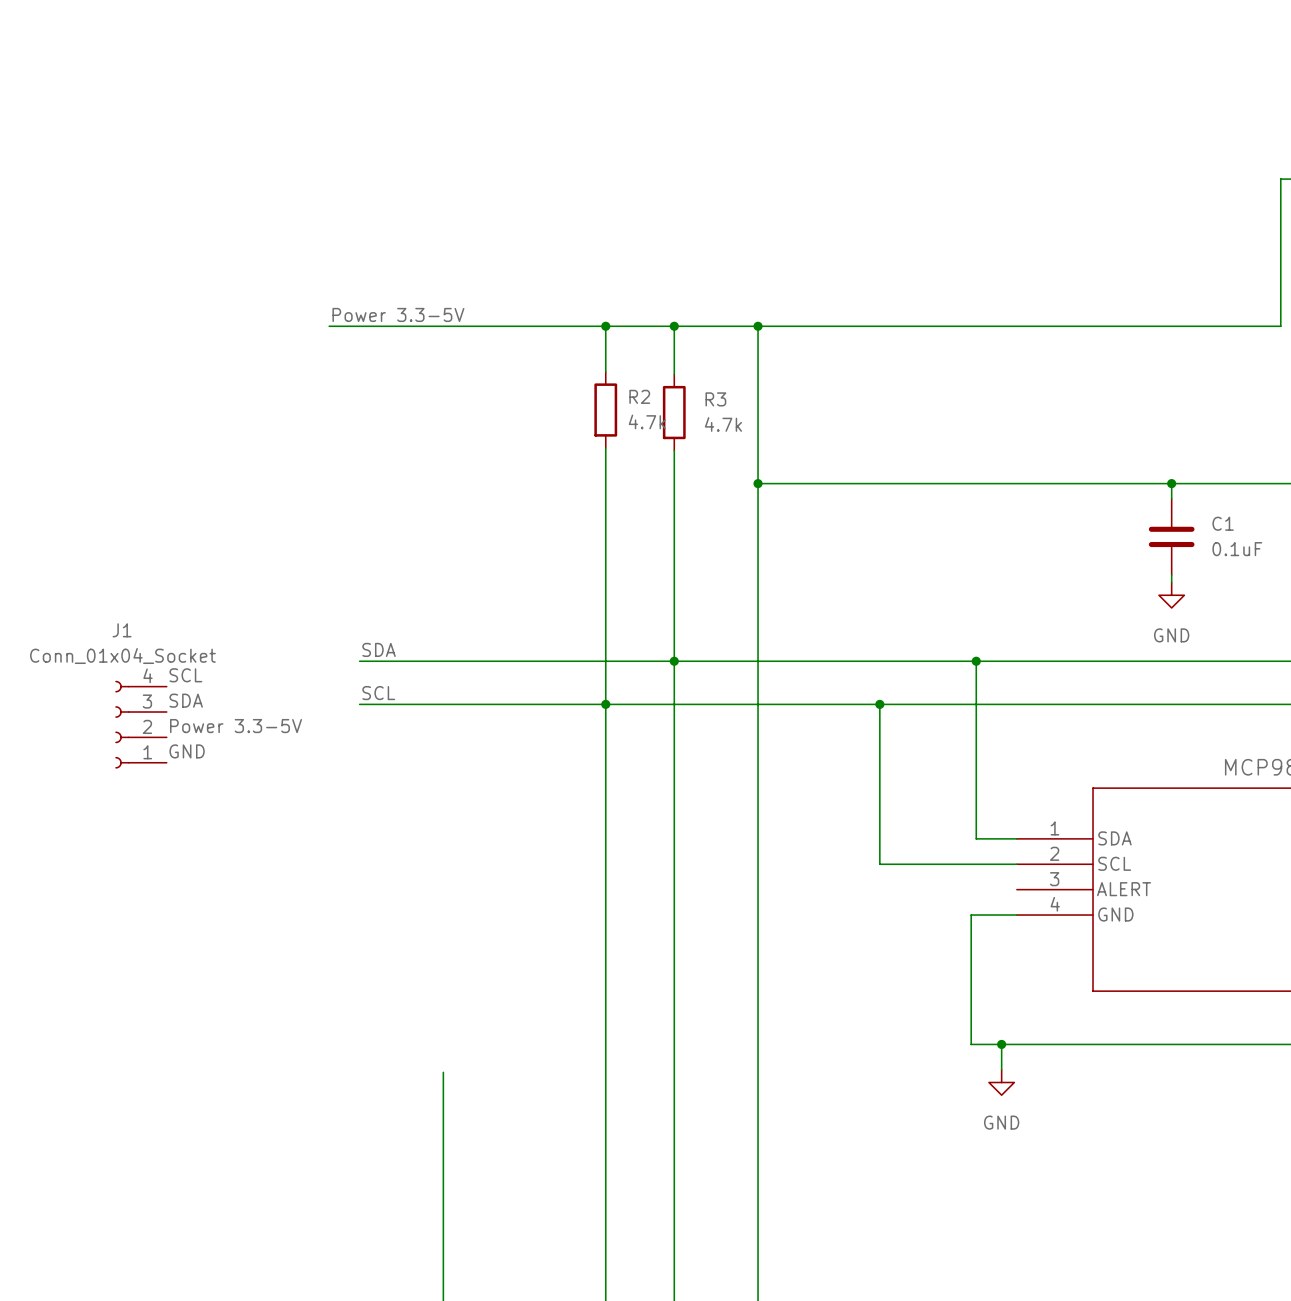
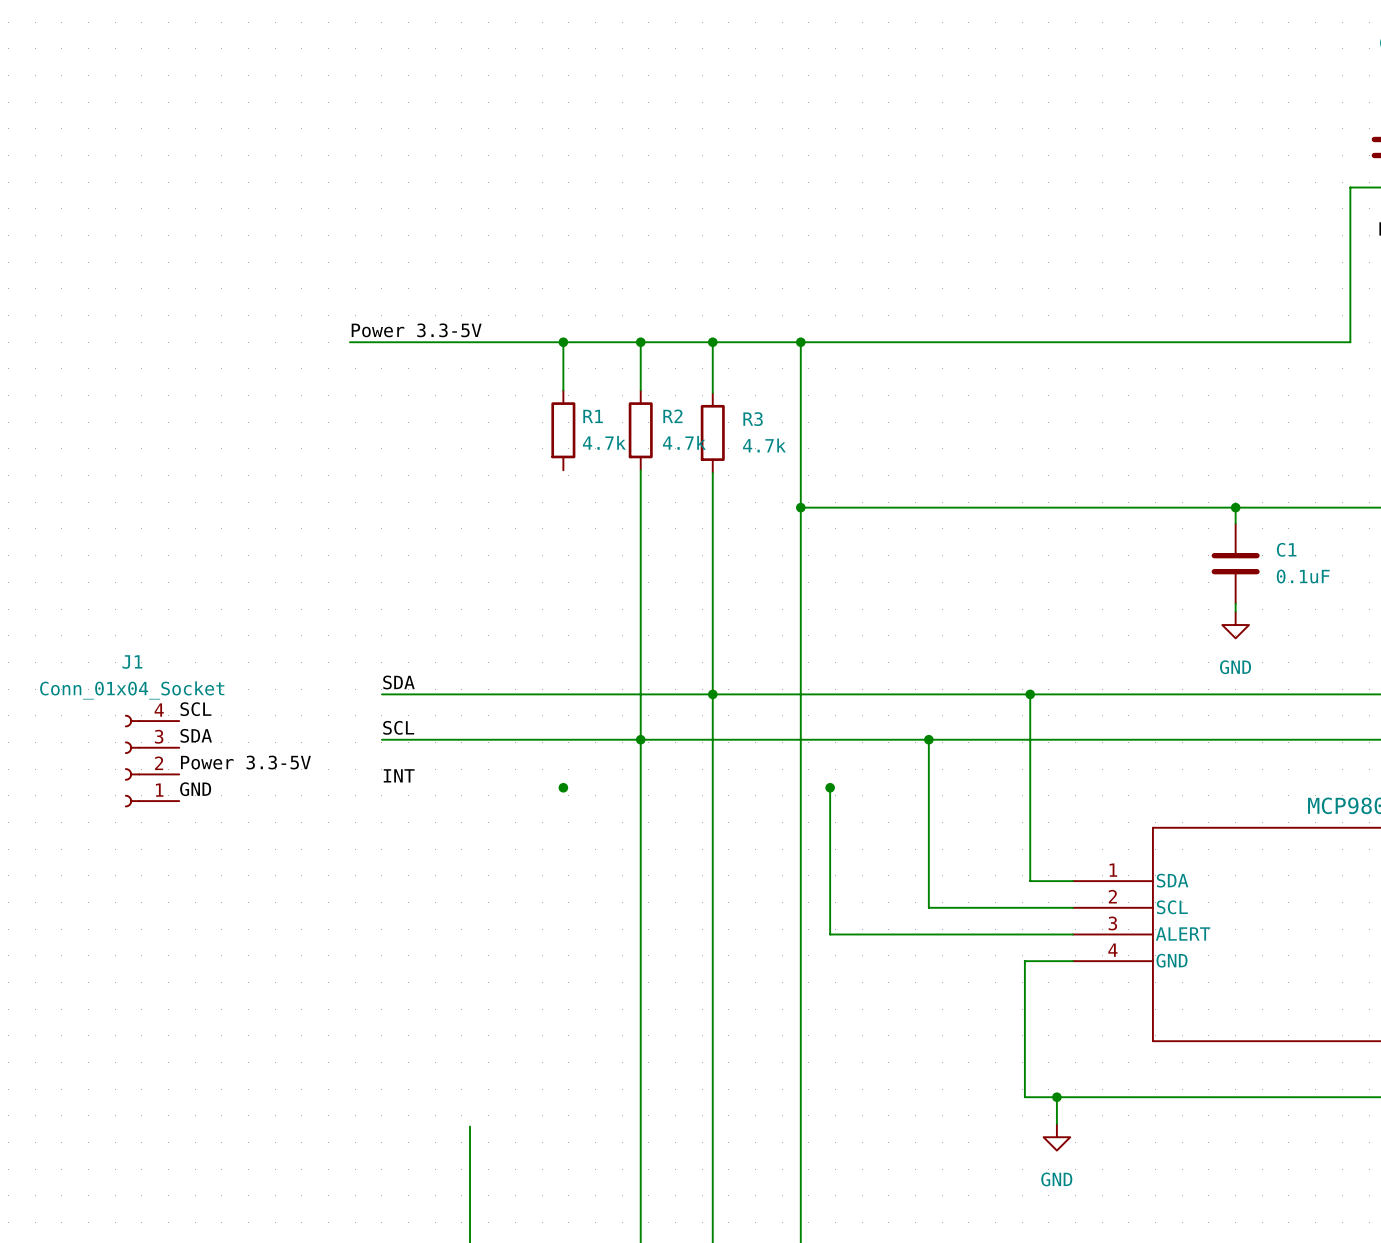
wire: none -> (563, 342) (563, 390)
junction: none -> (563, 342)
R1: none -> 4.7k (563, 430)
label: none -> INT (399, 775)
junction: none -> (563, 787)
wire: none -> (830, 787) (830, 934) (1072, 934)
junction: none -> (830, 787)

